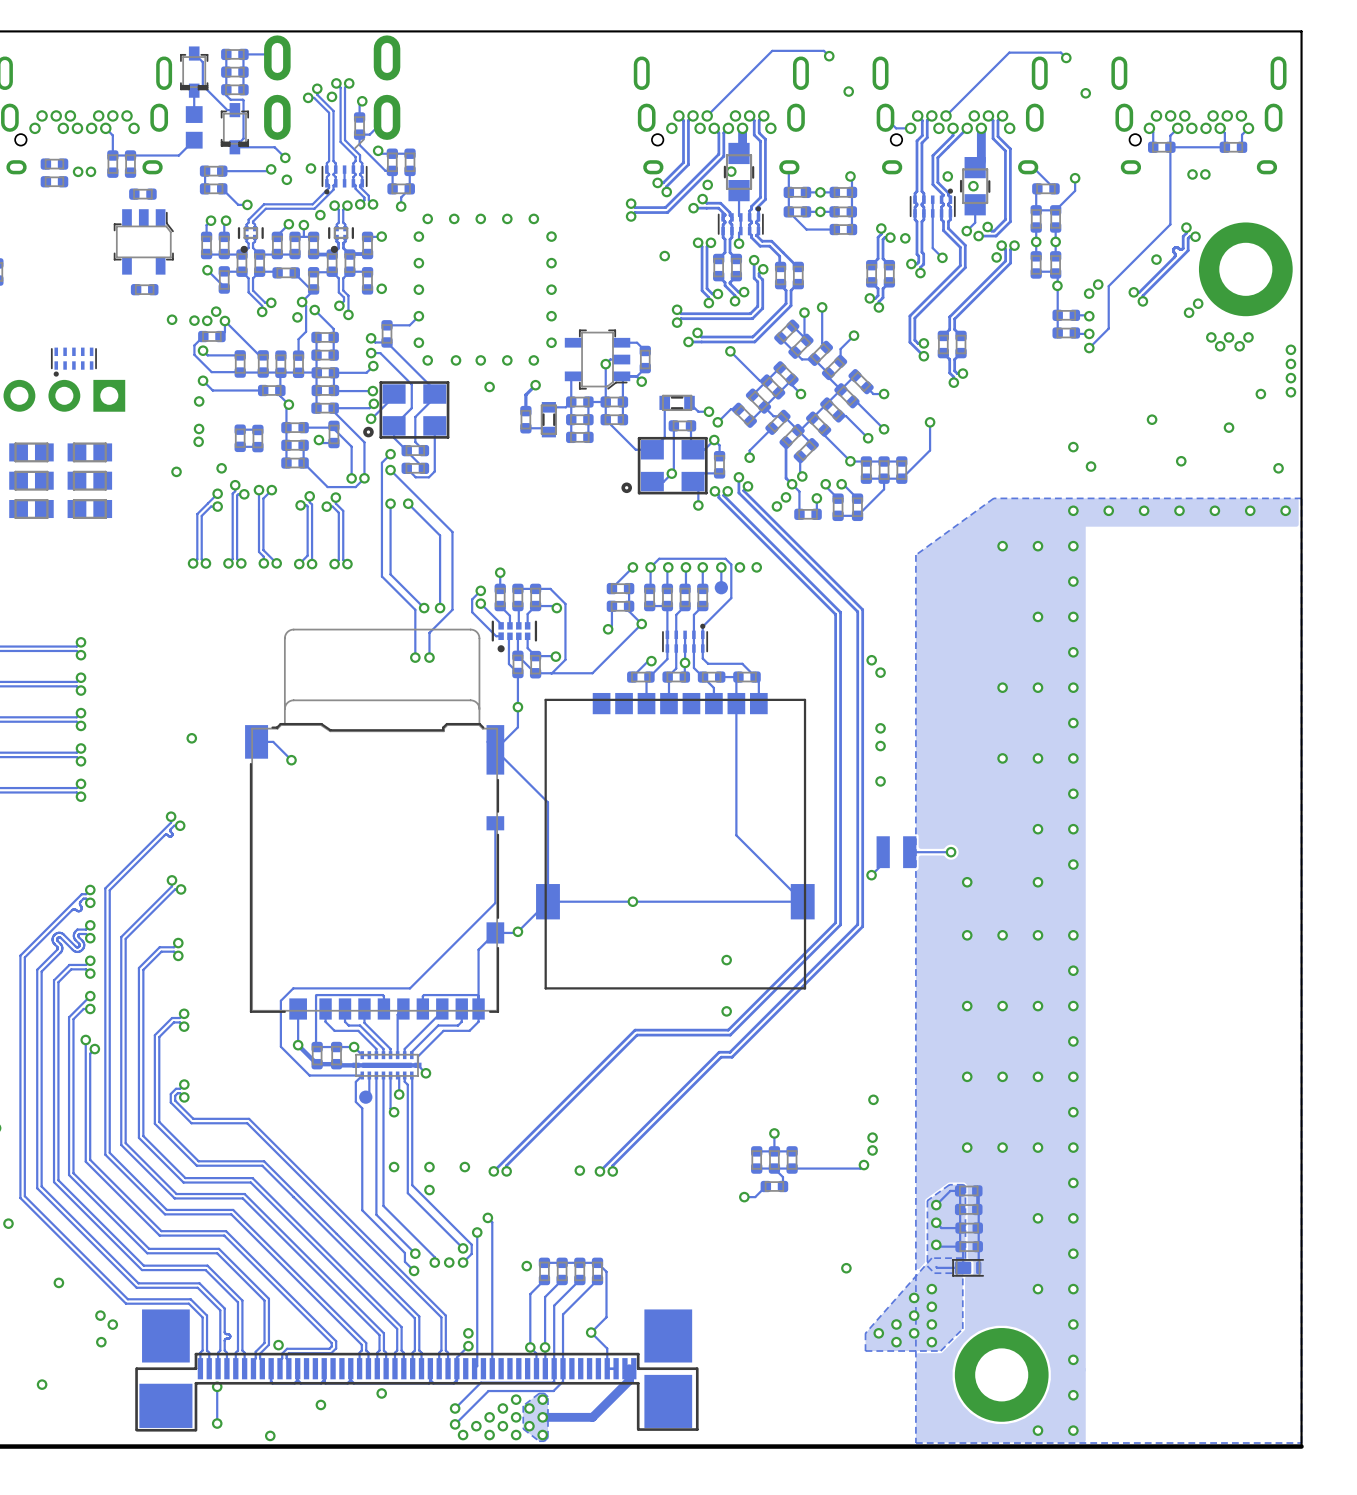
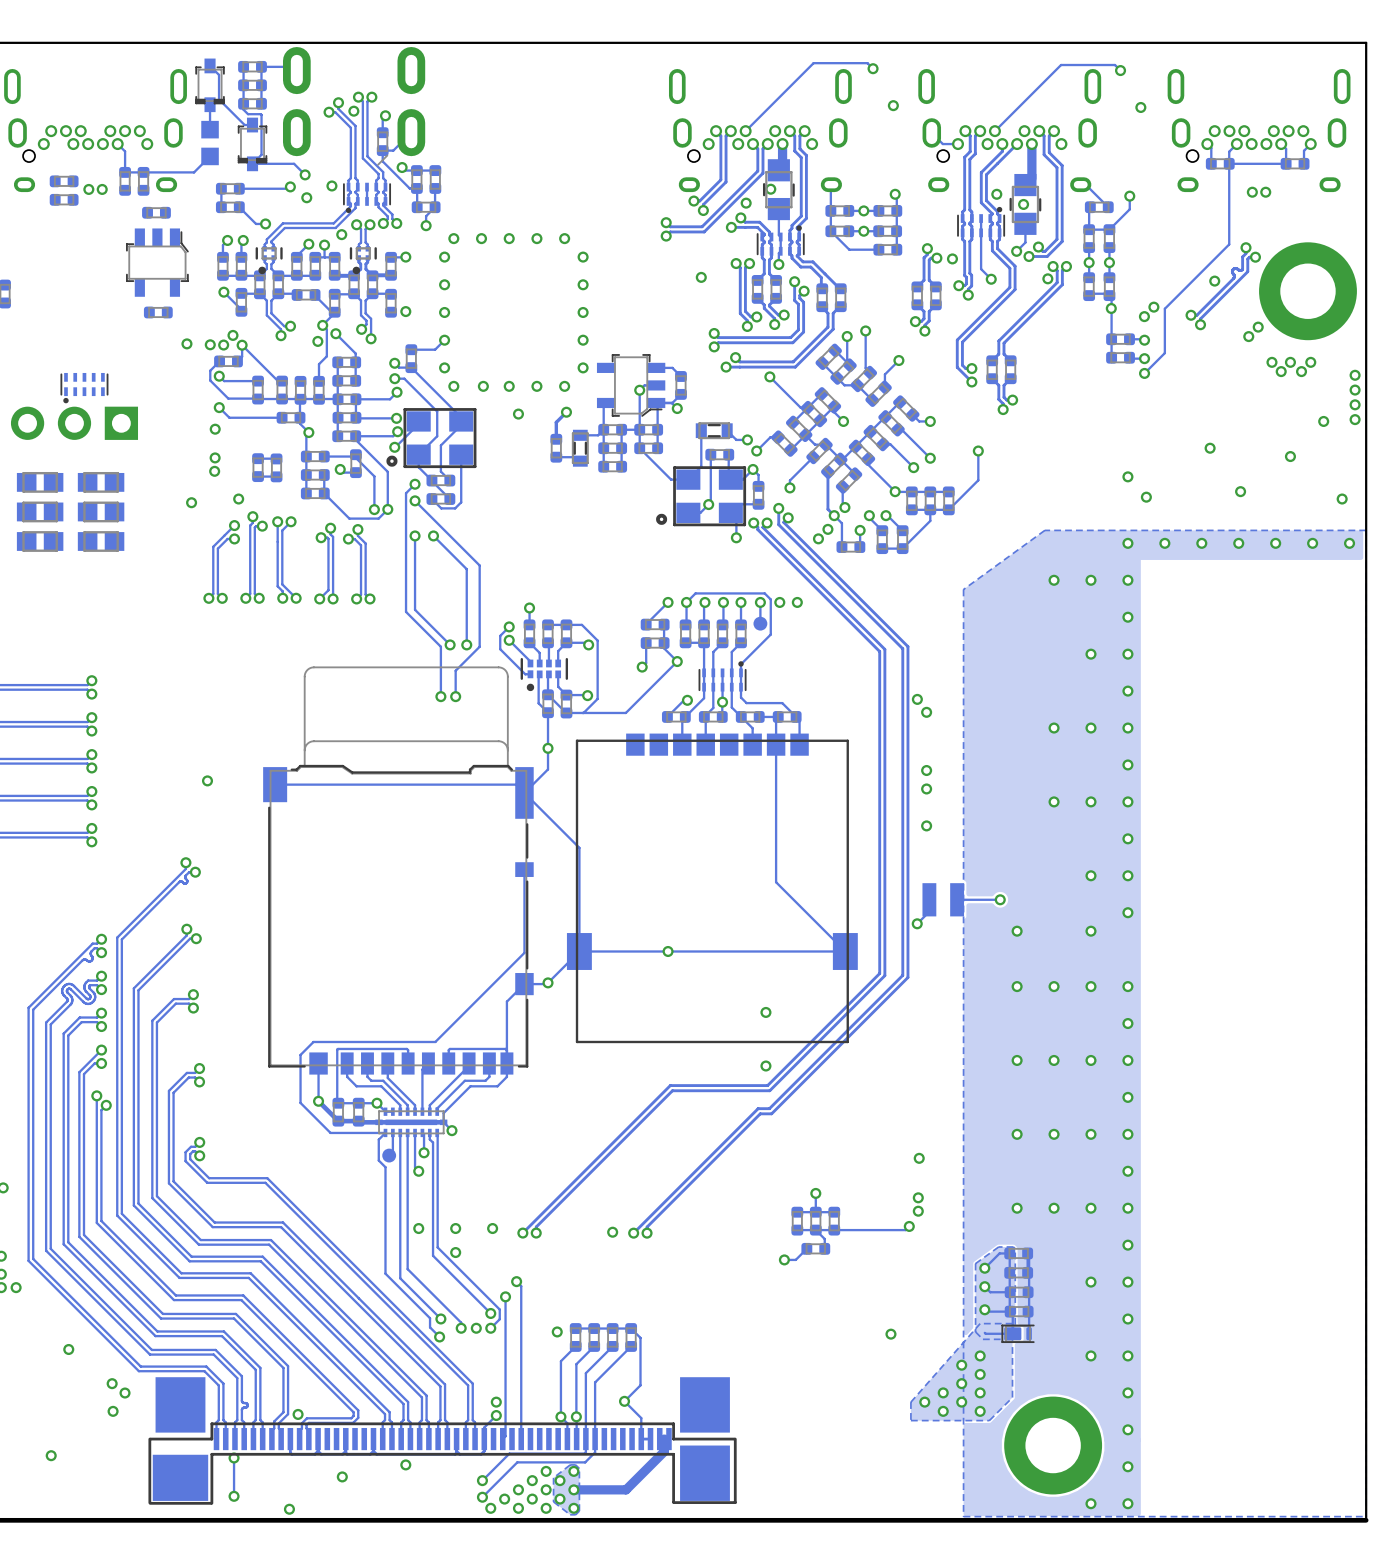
track: (828, 373) (828, 377) (840, 389) -> none
track: (273, 741) (291, 760) -> (292, 784) (516, 784)
via: (291, 760) -> none

